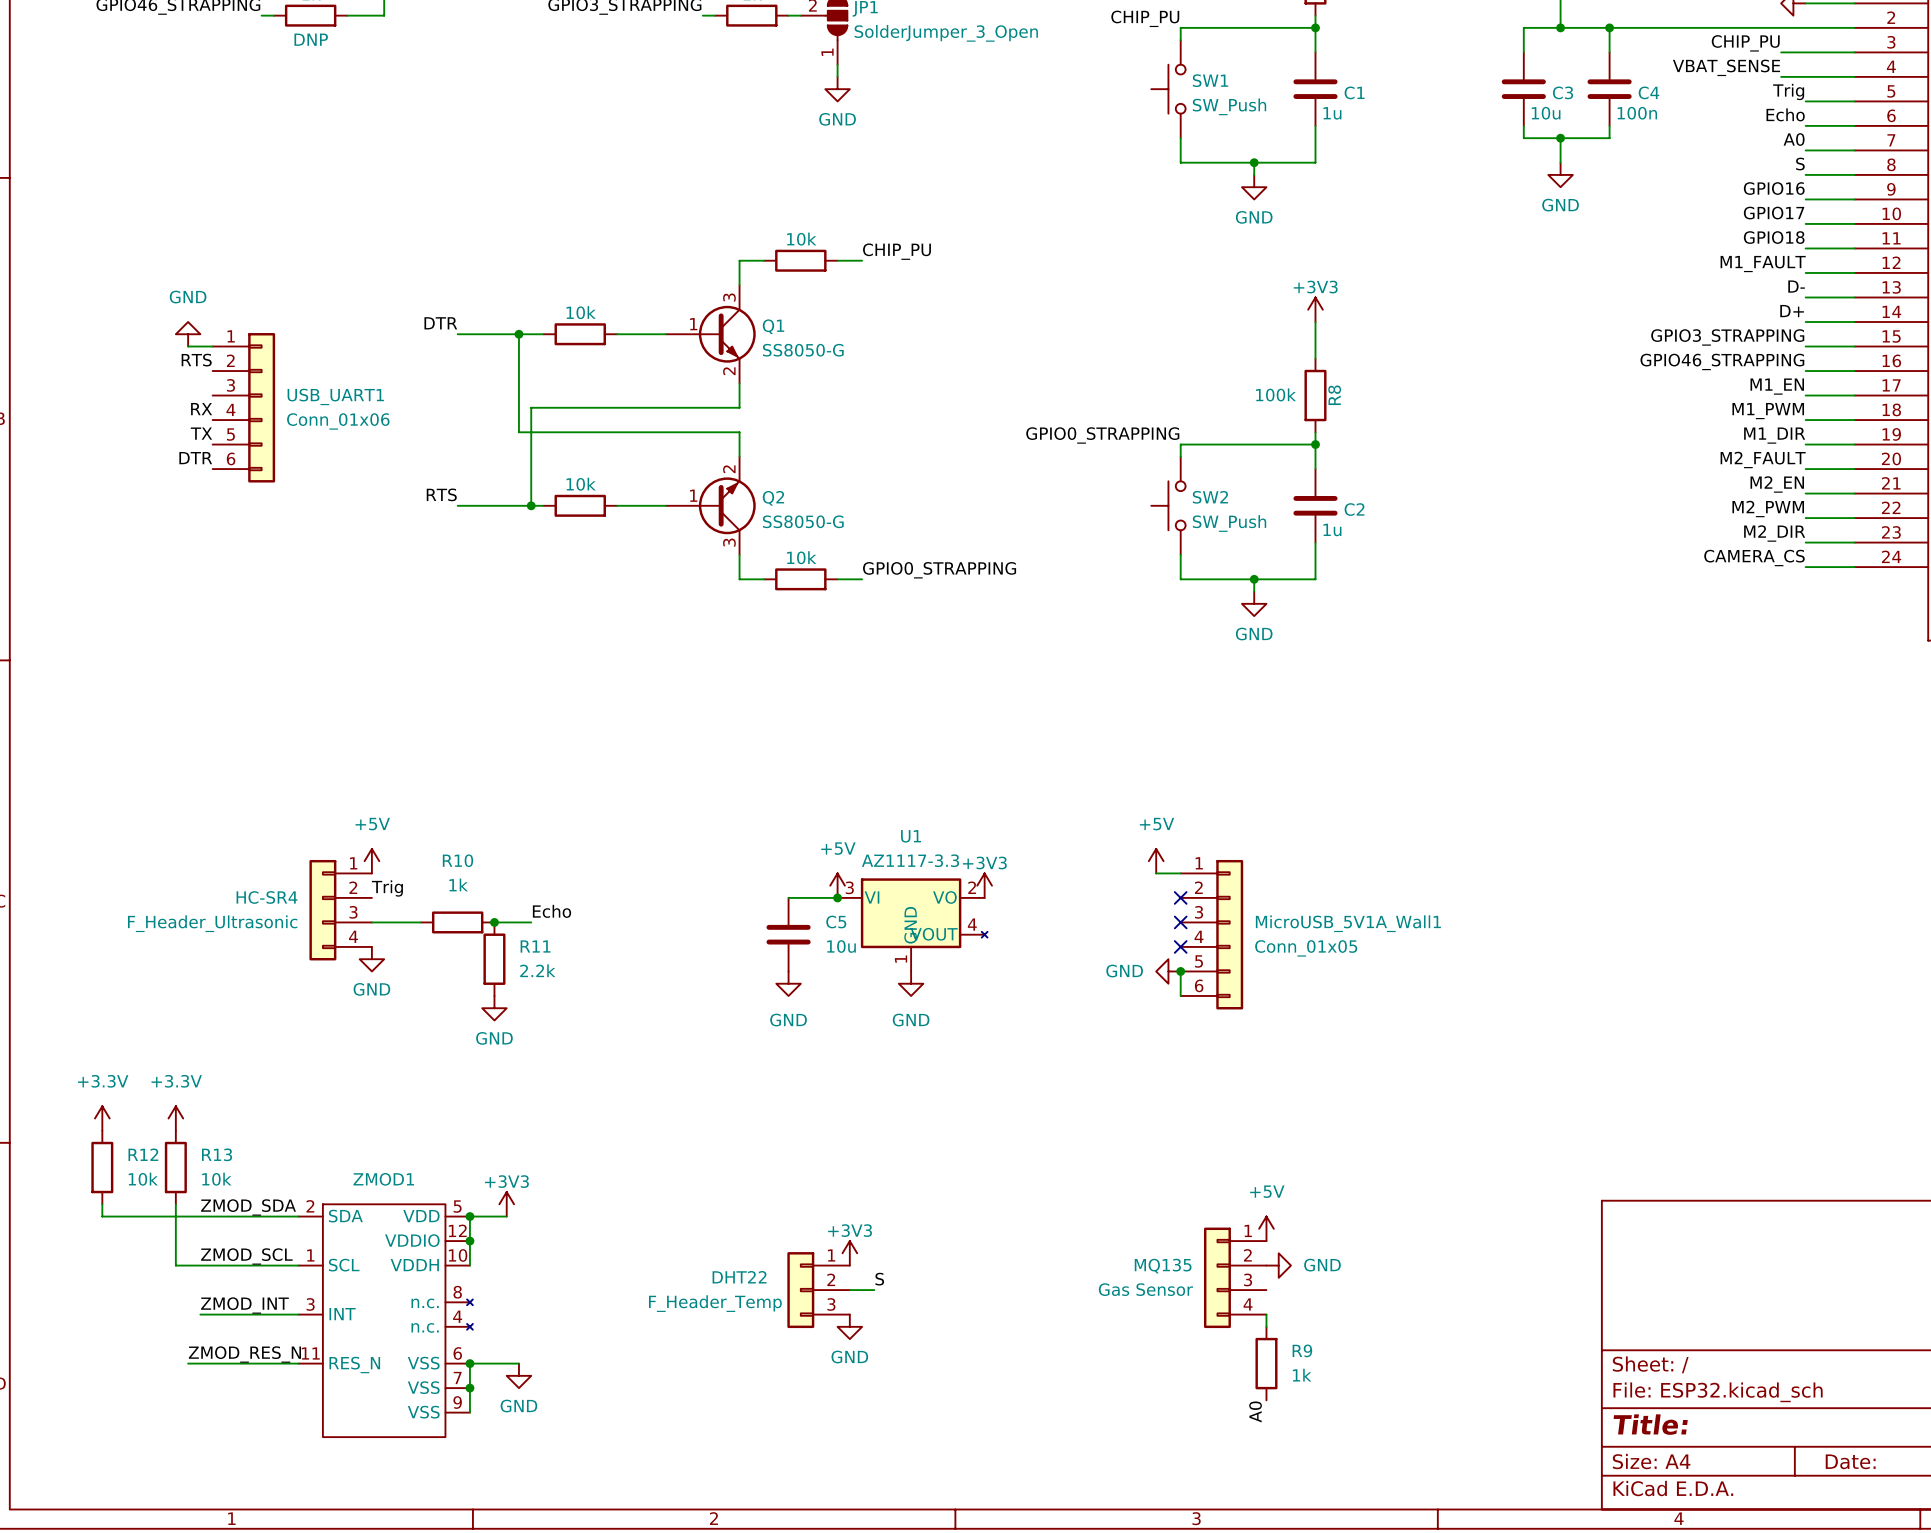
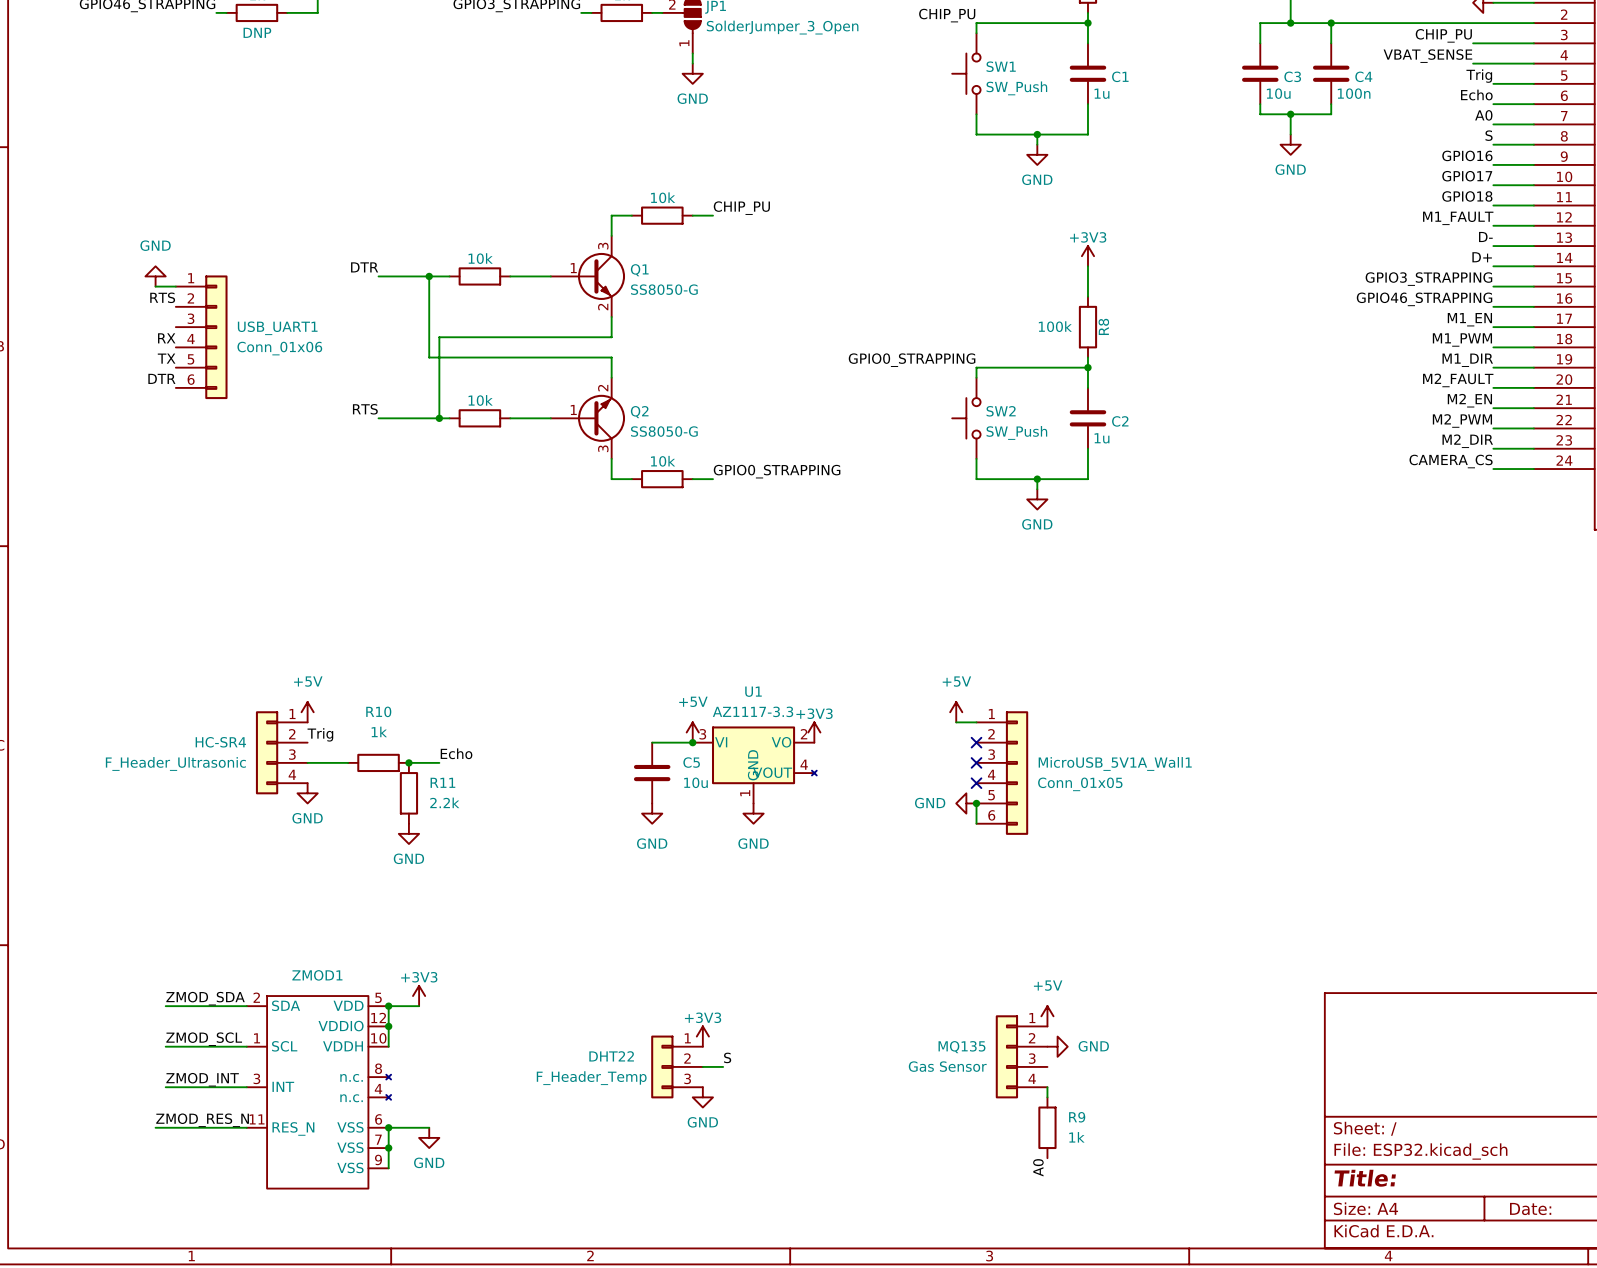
power symbol: +3.3V (102, 1118) -> none
power symbol: +3.3V (175, 1118) -> none
R12: 10k (102, 1167) -> none
R13: 10k (175, 1167) -> none
wire: (102, 1204) (102, 1216) (200, 1216) -> none
wire: (175, 1204) (175, 1265) (200, 1265) -> none

